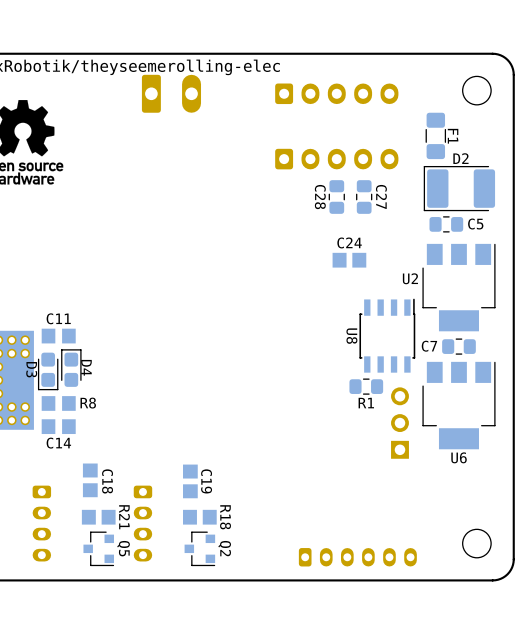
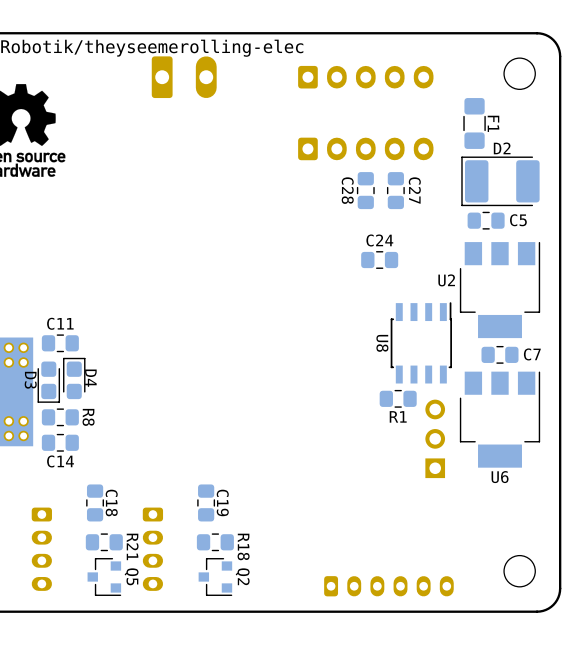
C24 footprint: [332, 252, 367, 268] -> [361, 251, 399, 269]
C11 footprint: [41, 328, 76, 344] -> [41, 334, 79, 353]
C7 name position: C7 (429, 346) -> C7 (532, 354)
R8 footprint: [41, 396, 76, 411] -> [41, 408, 79, 427]
C14 footprint: [41, 419, 76, 435] -> [41, 433, 79, 452]
C18 footprint: [82, 463, 98, 498] -> [86, 484, 104, 522]
C19 footprint: [183, 464, 198, 499] -> [197, 484, 216, 522]
R21 footprint: [81, 509, 116, 525] -> [85, 533, 123, 552]
R18 footprint: [183, 509, 217, 525] -> [196, 533, 234, 552]

